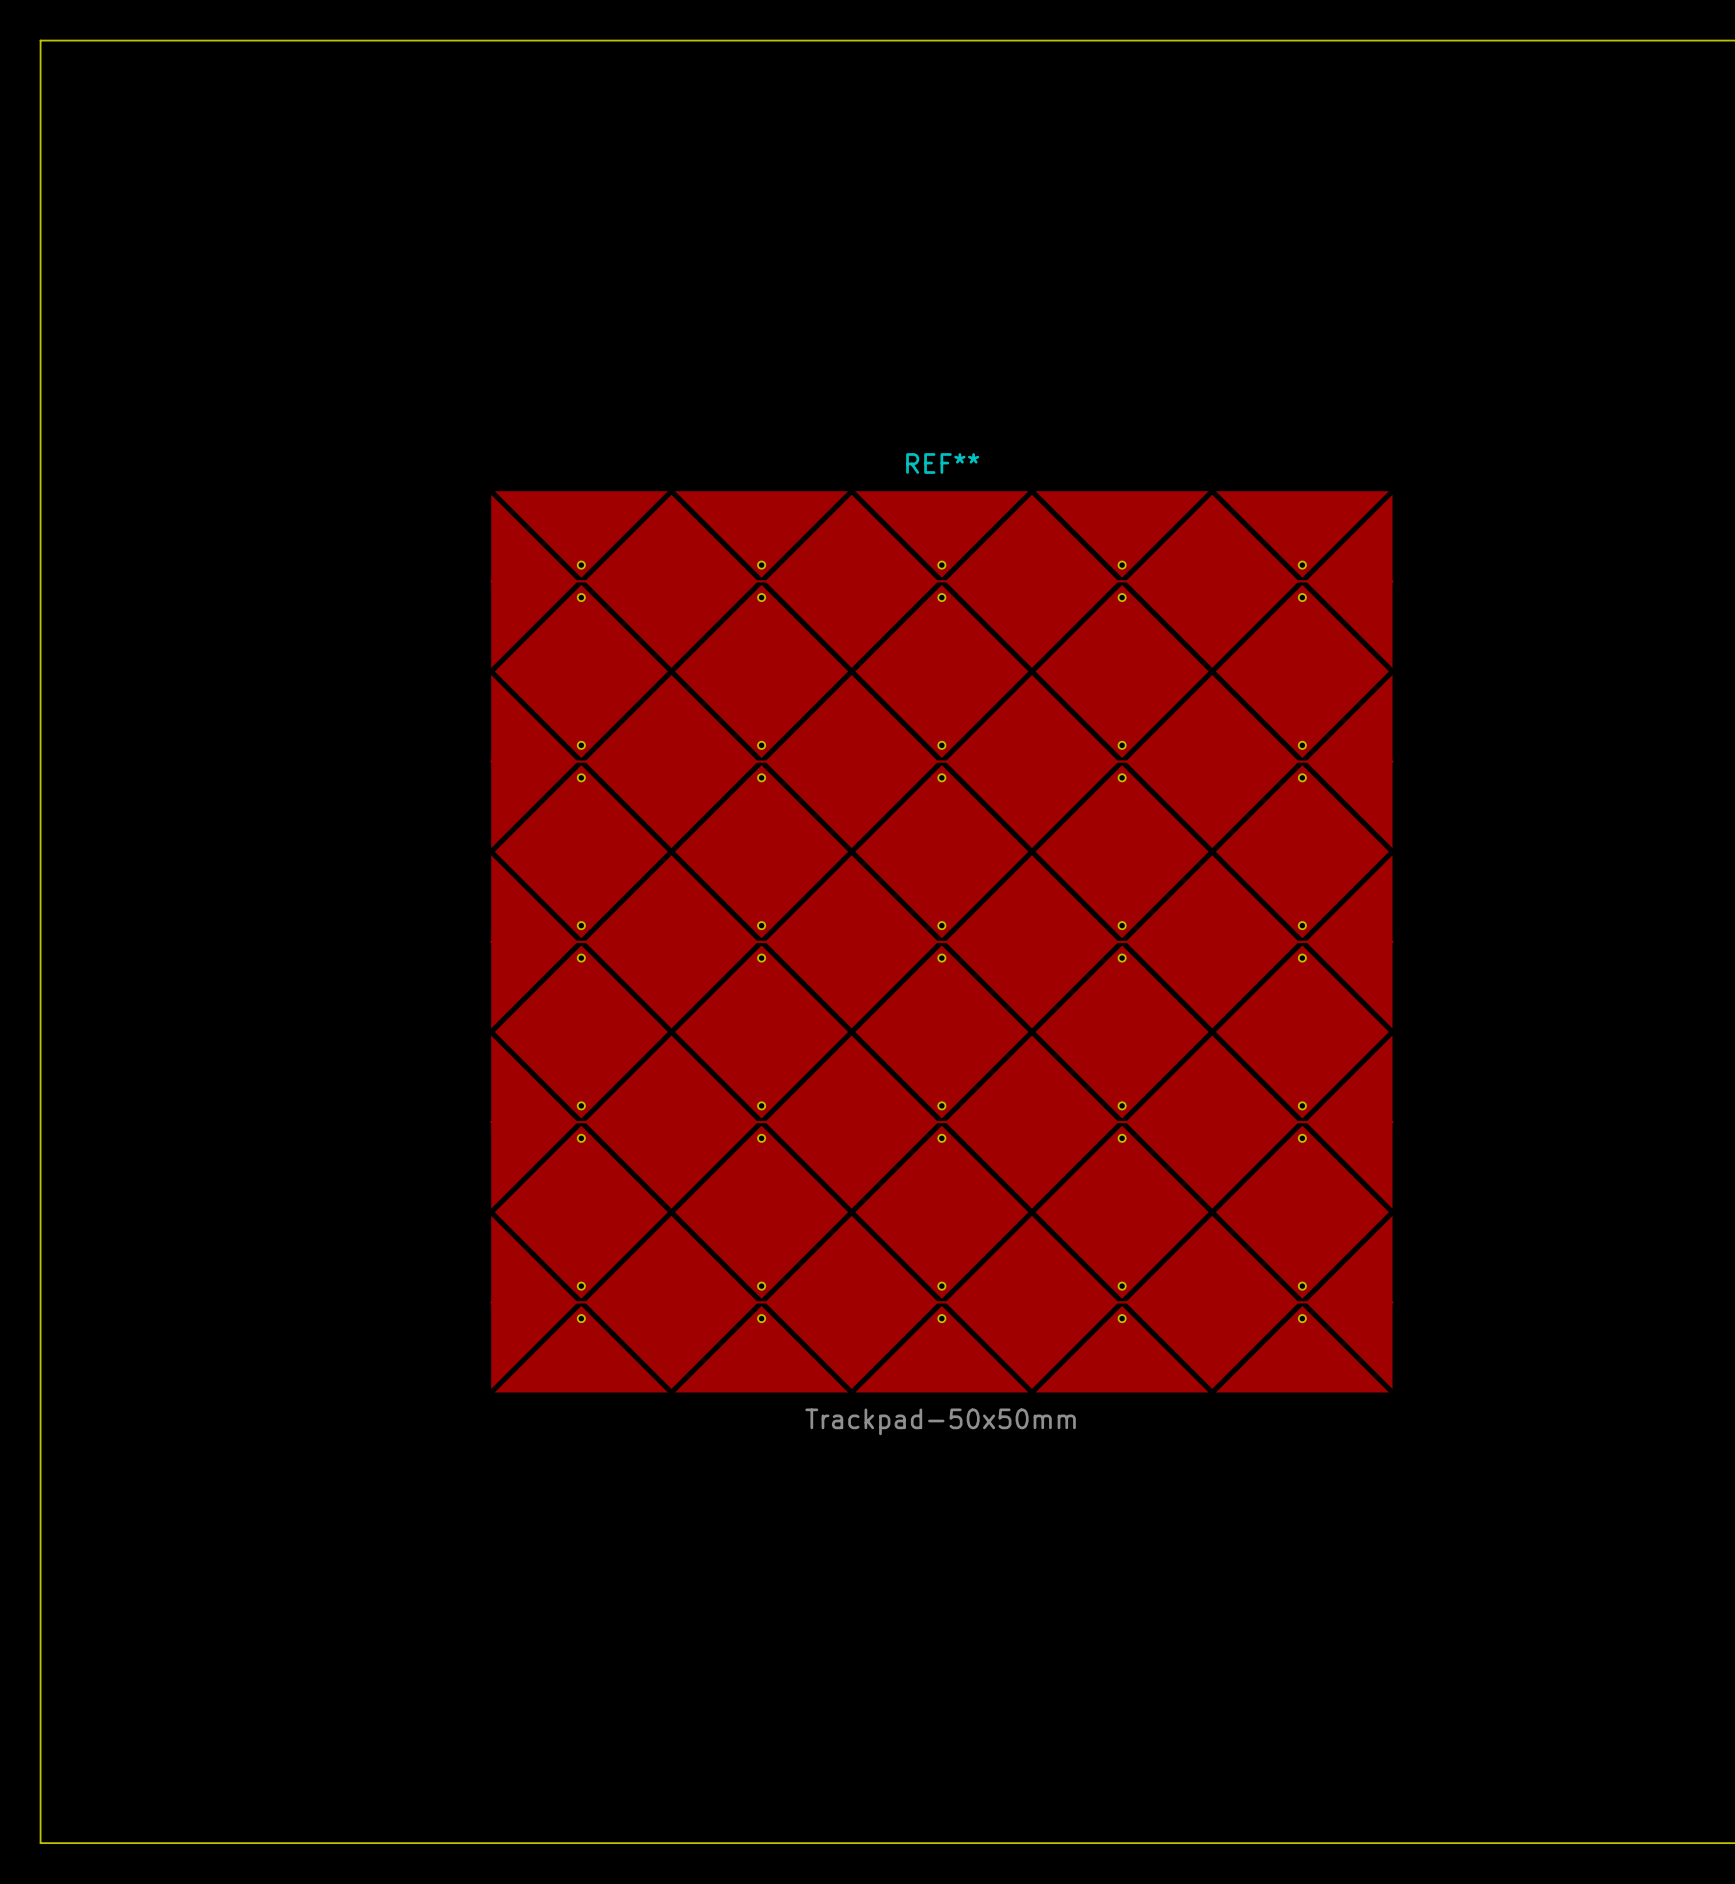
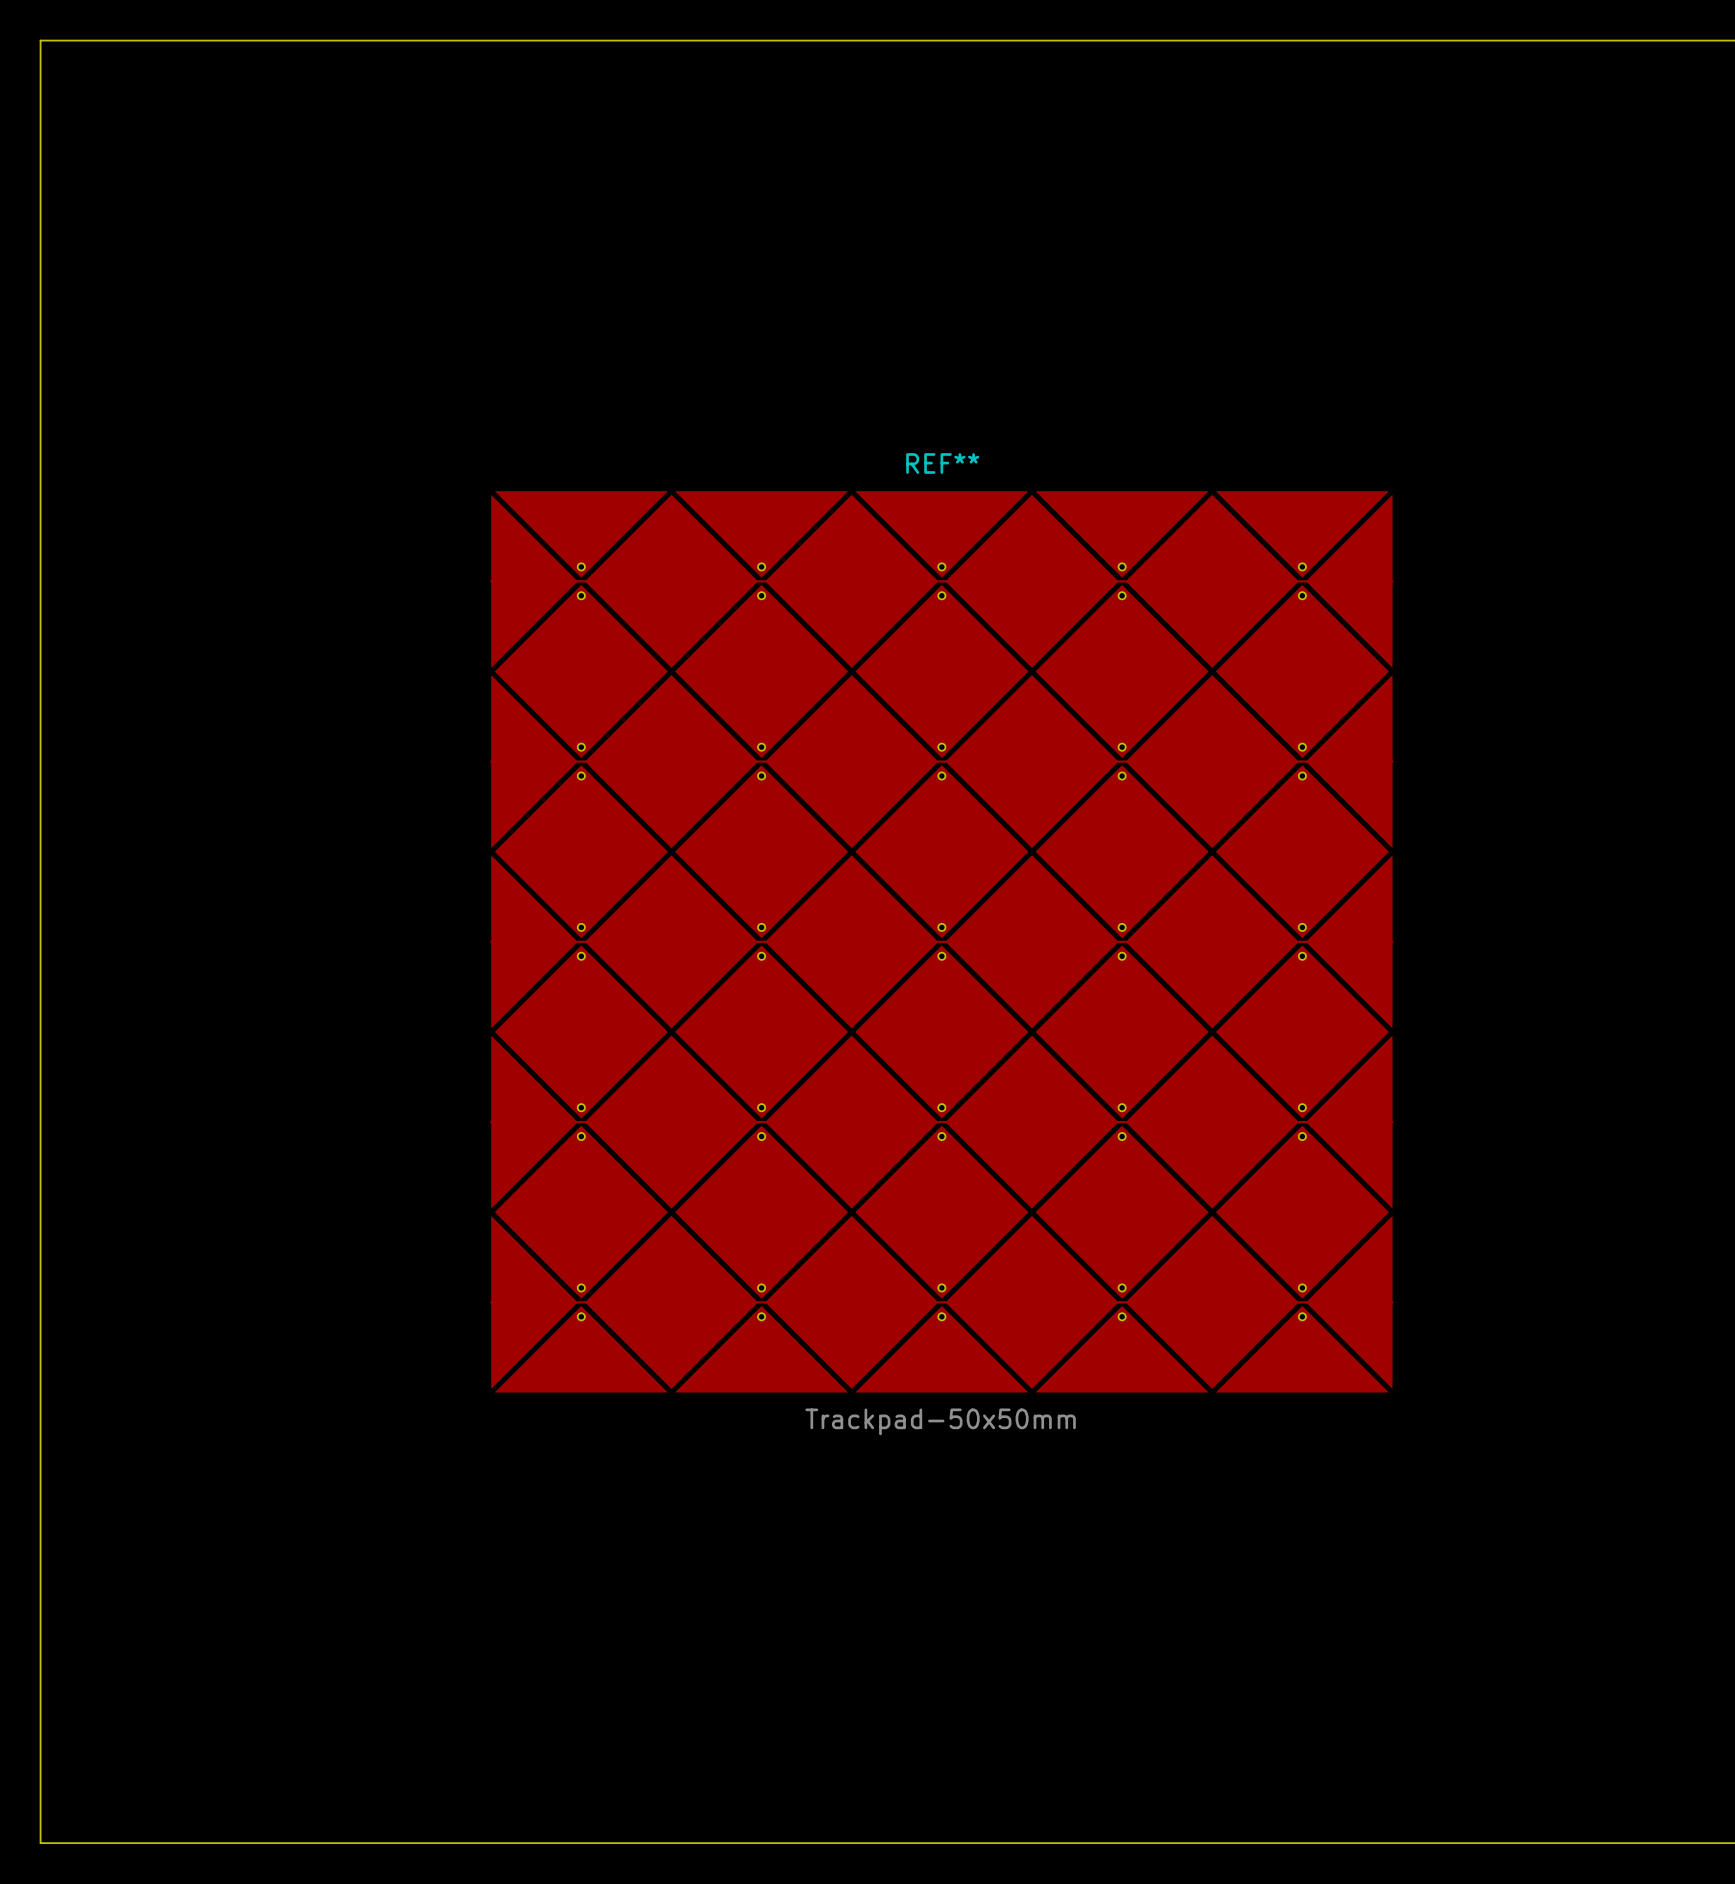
REF** footprint: [490, 491, 1394, 1393] -> [490, 491, 1394, 1393]

